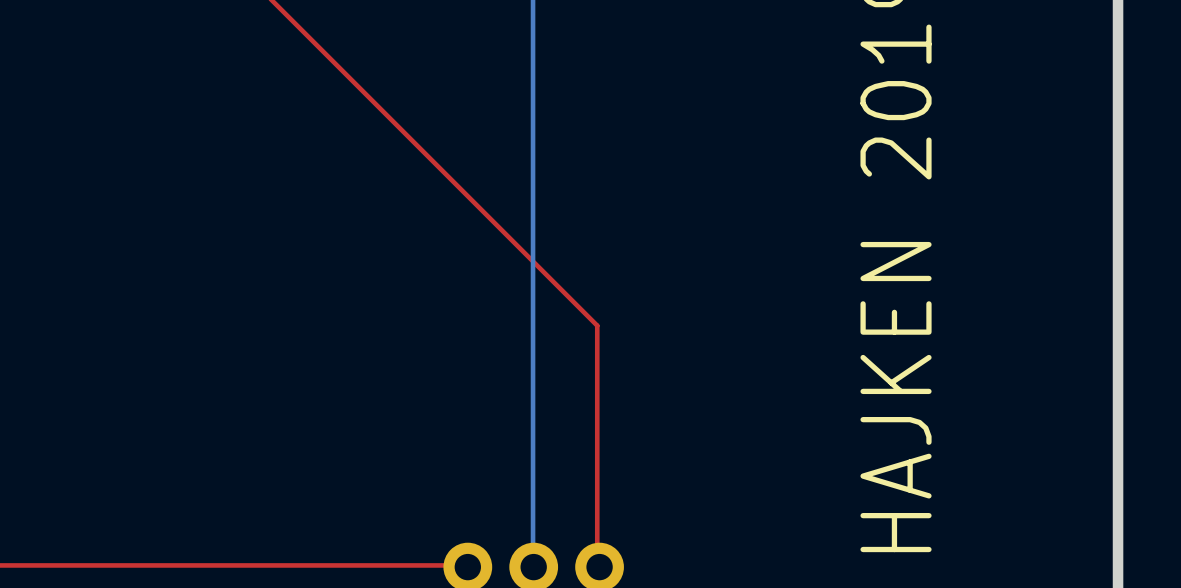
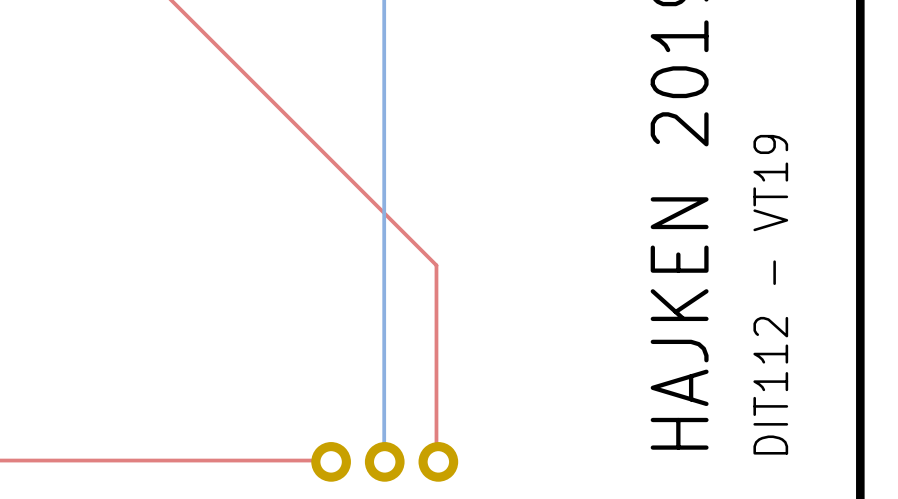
text: none -> DIT112 - VT19 (770, 294)

